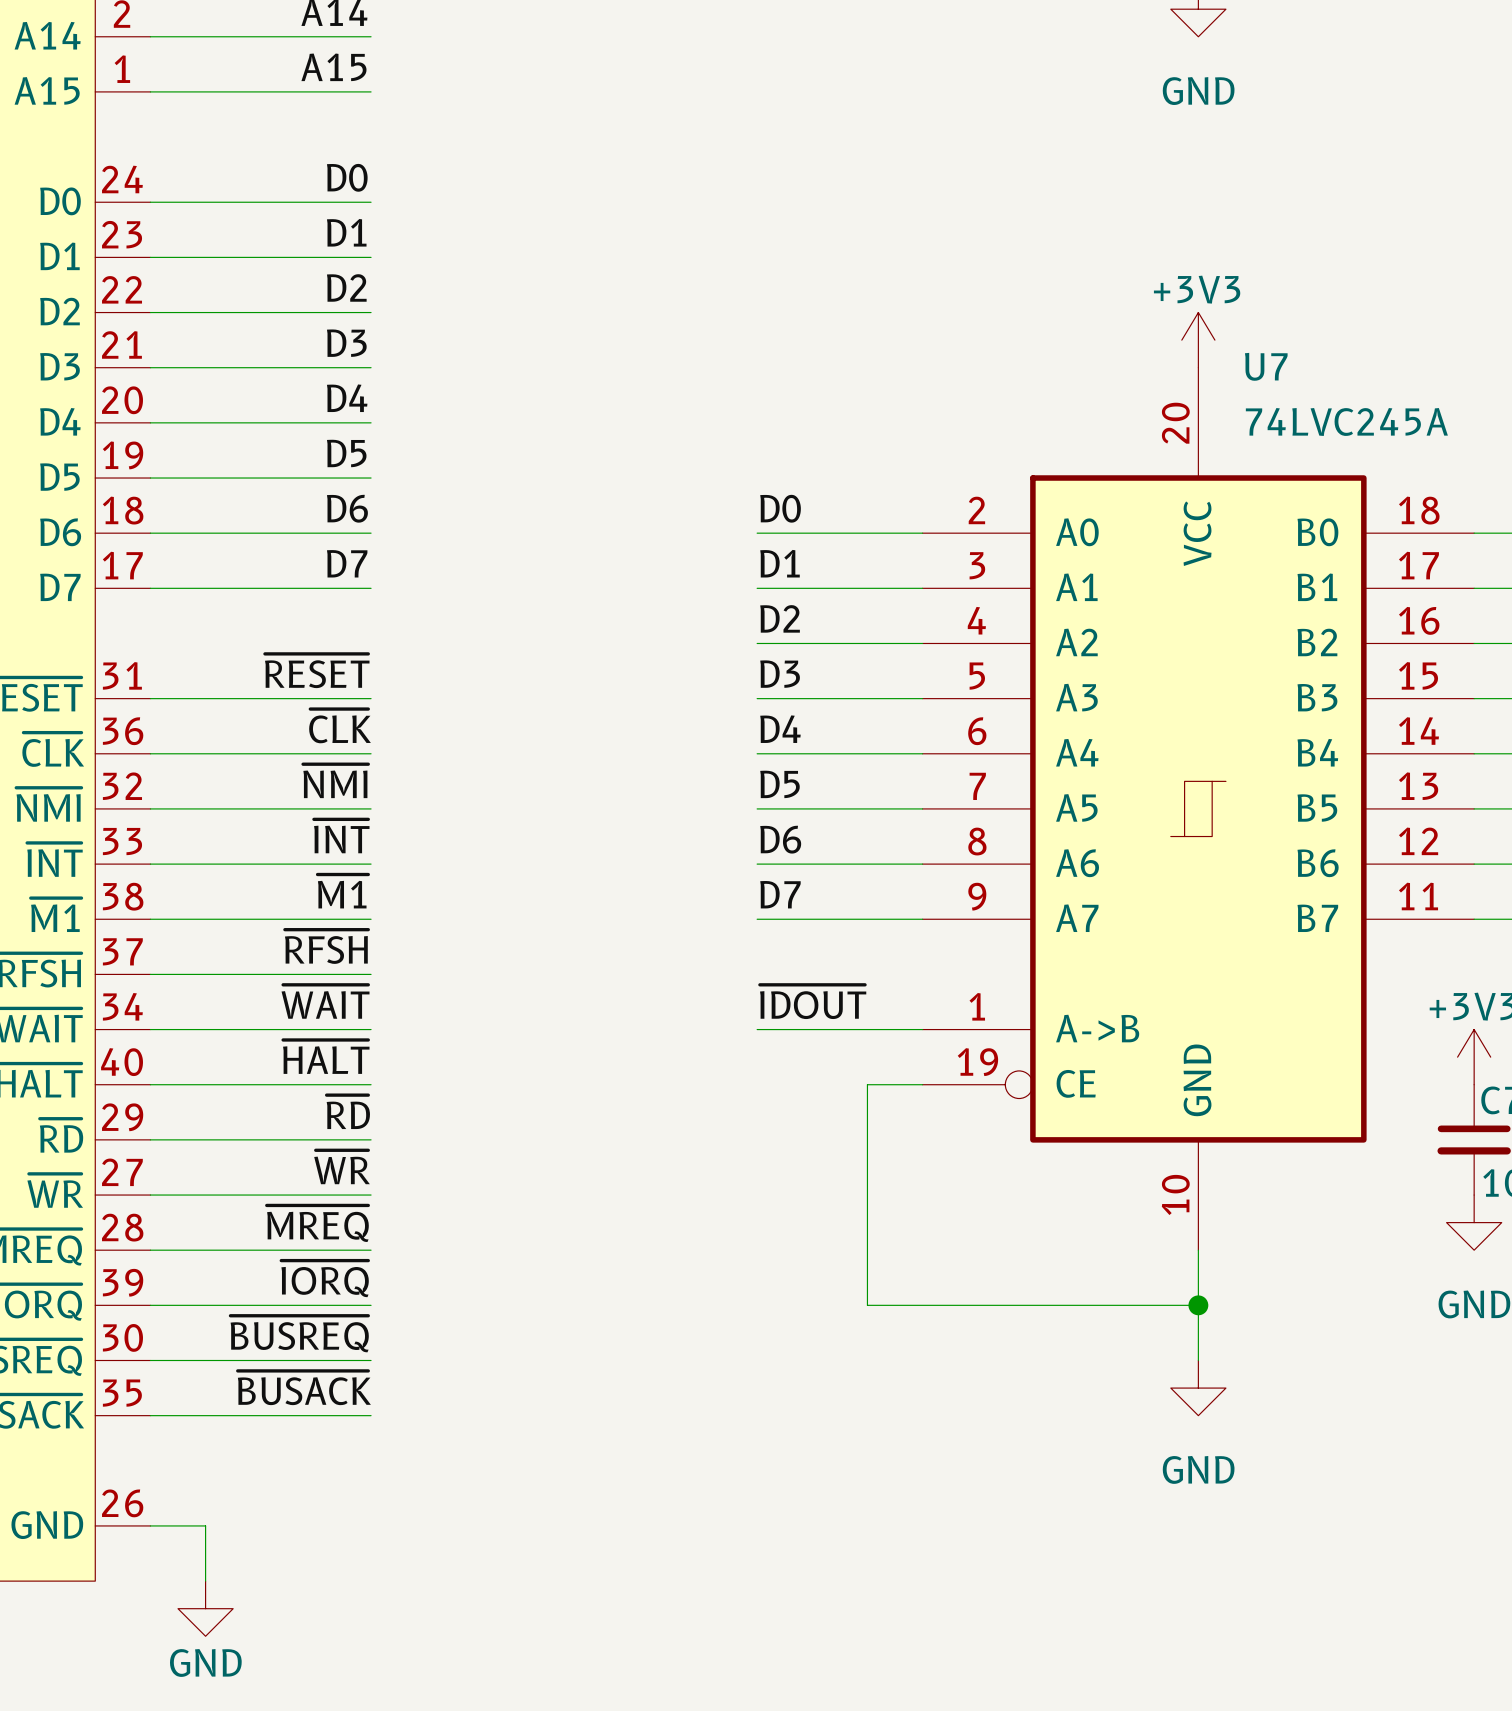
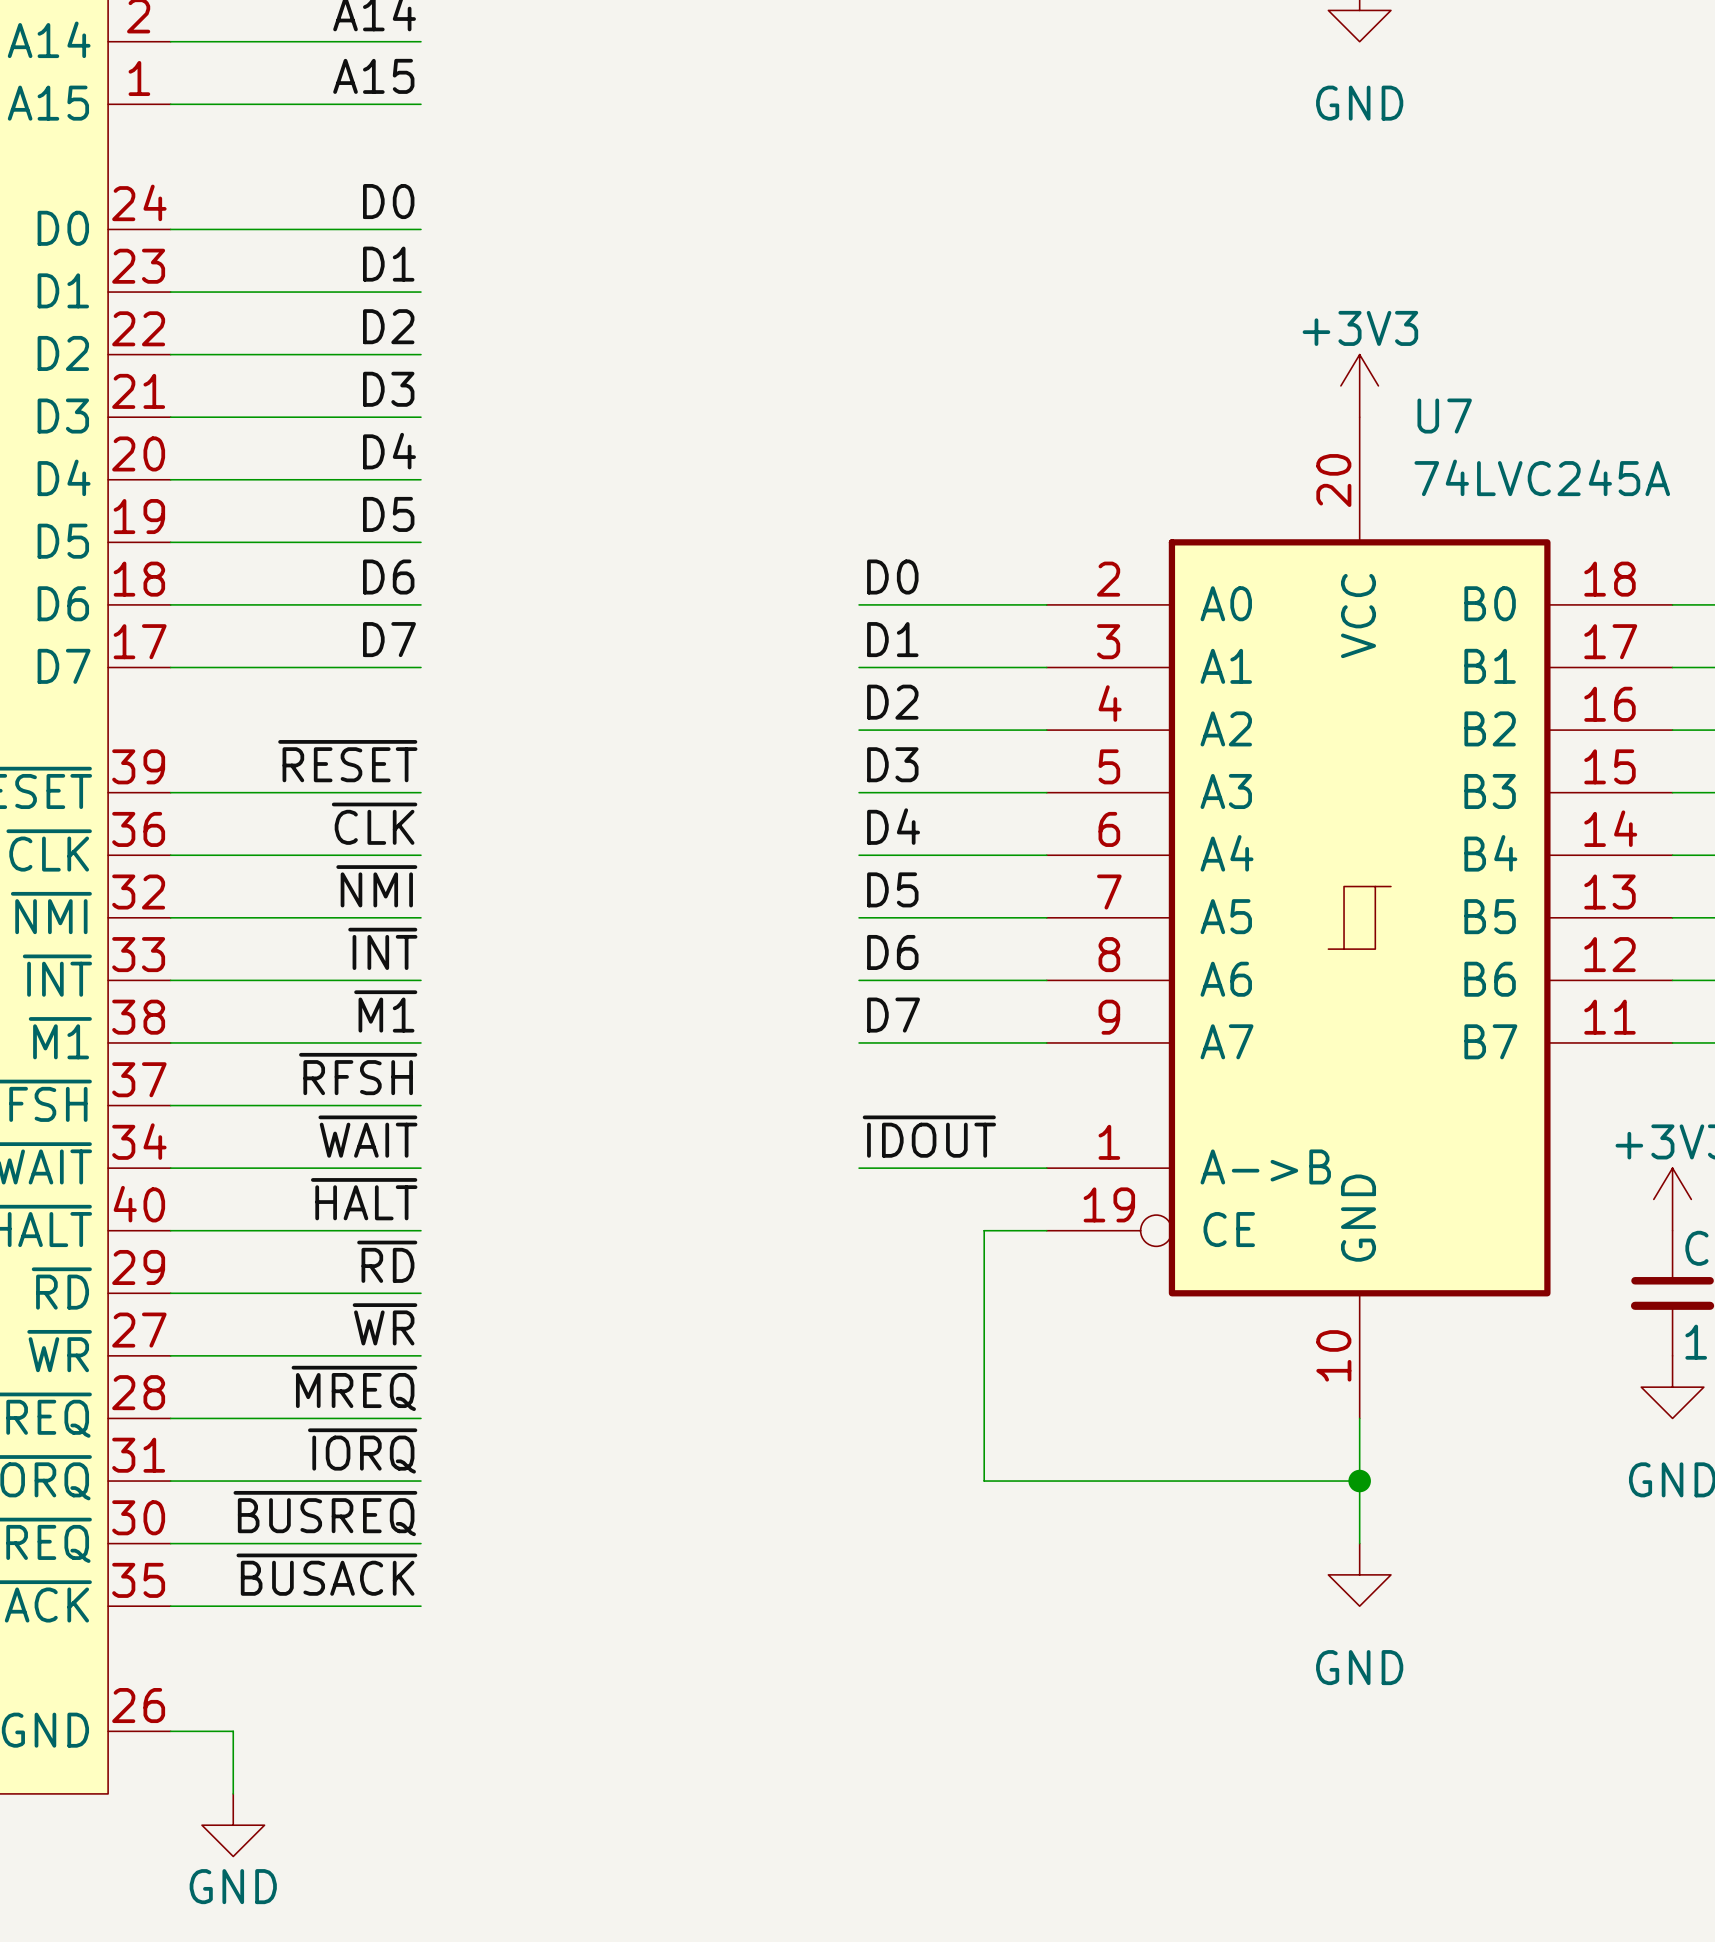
part pin number: 31 (122, 675) -> 39 (138, 766)
part pin number: 39 (123, 1282) -> 31 (138, 1455)

